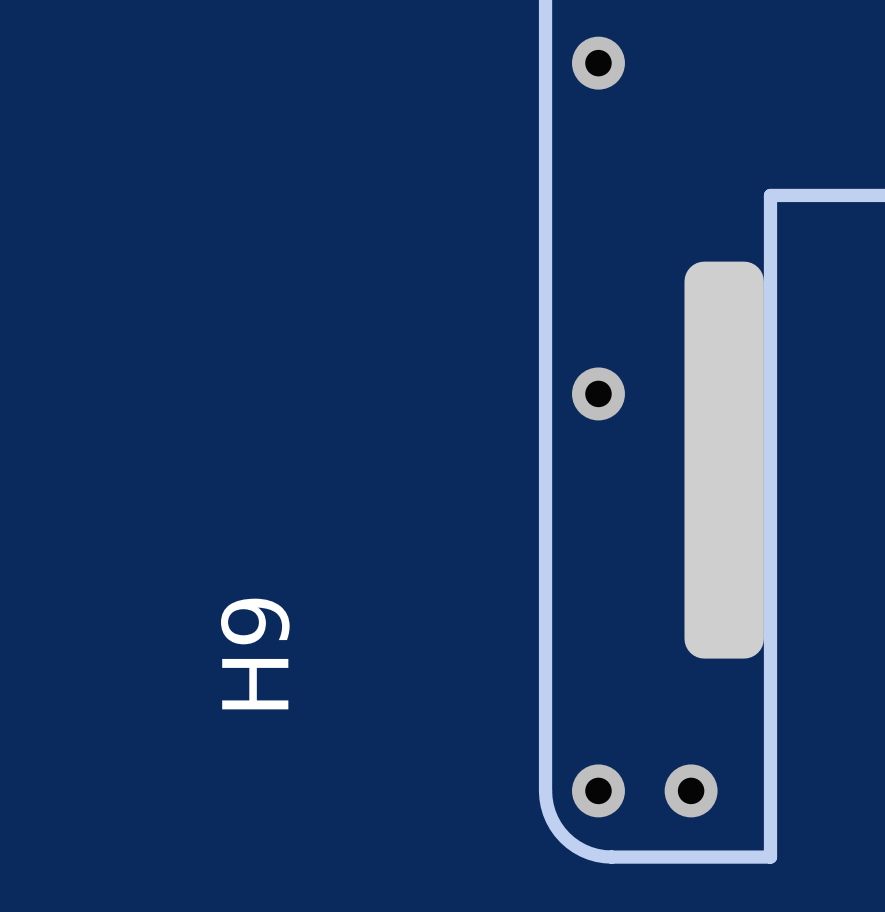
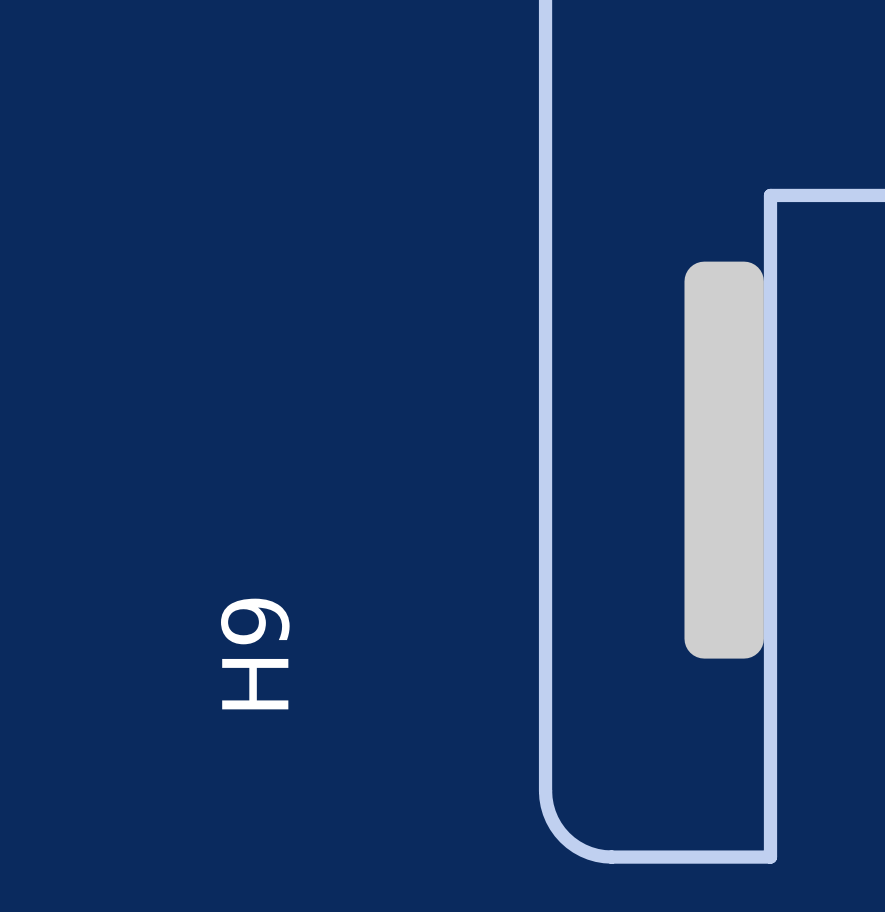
via: (598, 63) -> none
via: (598, 393) -> none
via: (598, 790) -> none
via: (691, 790) -> none

